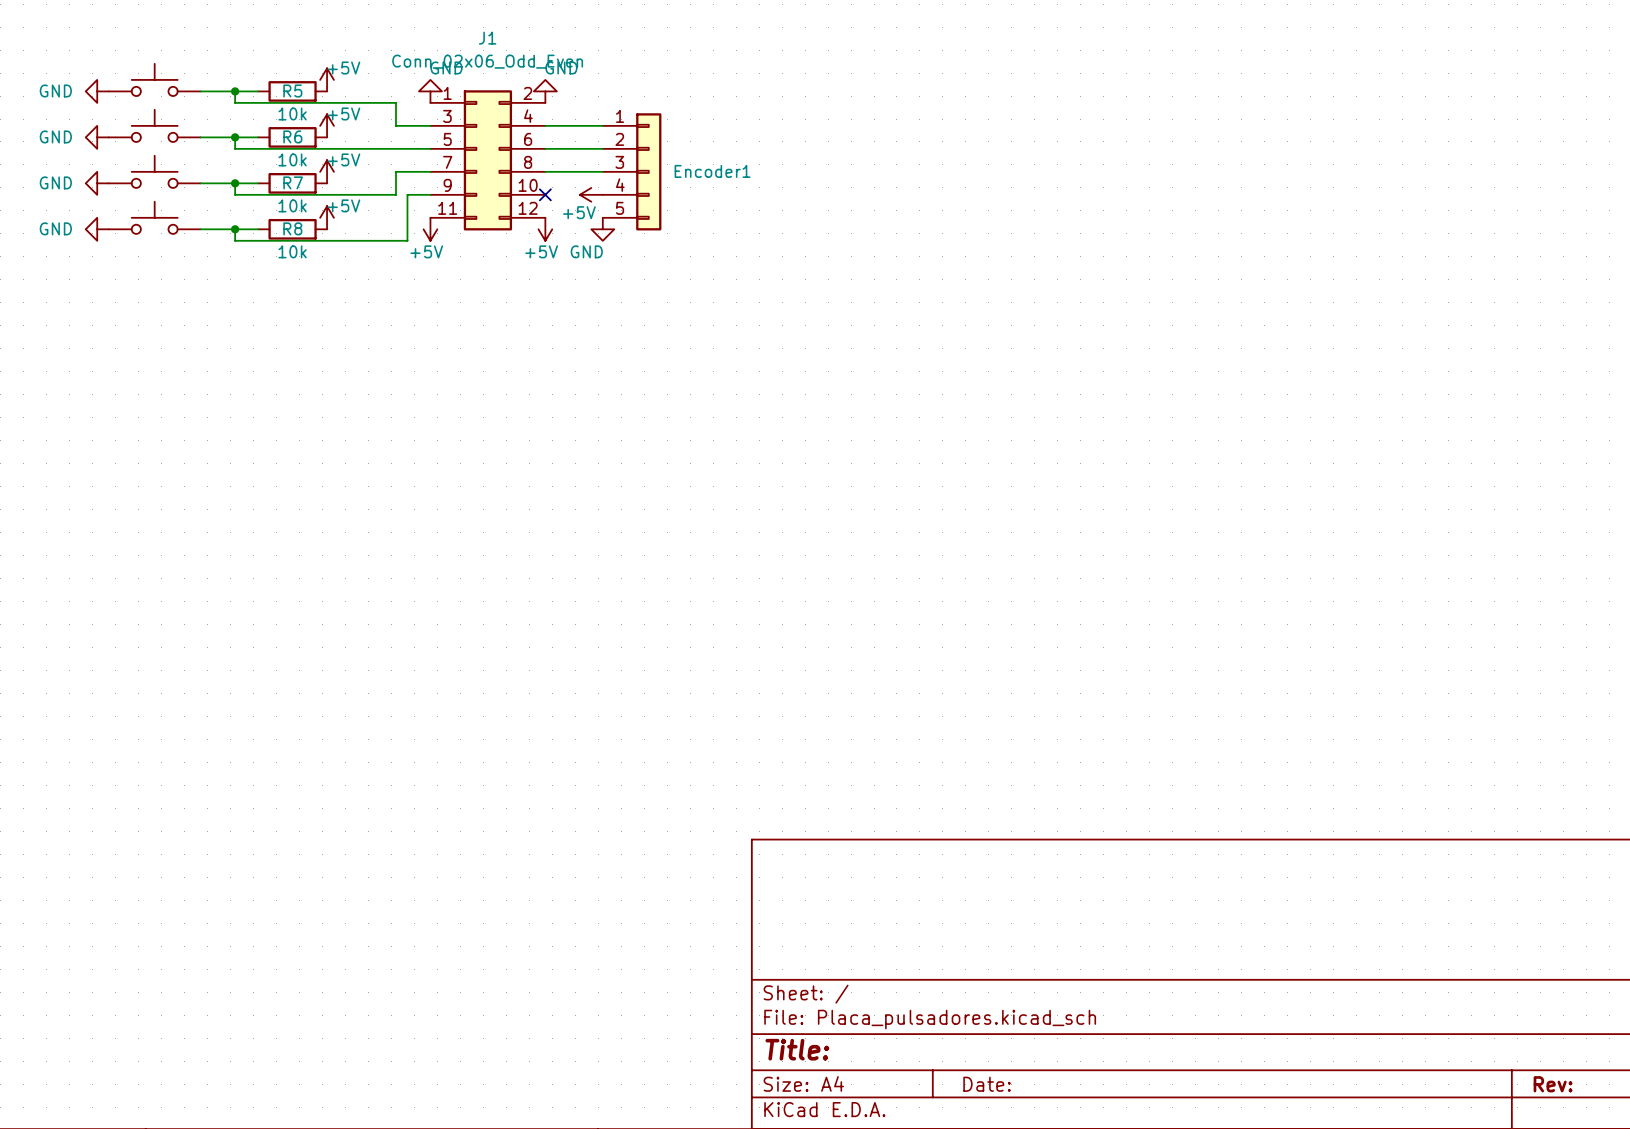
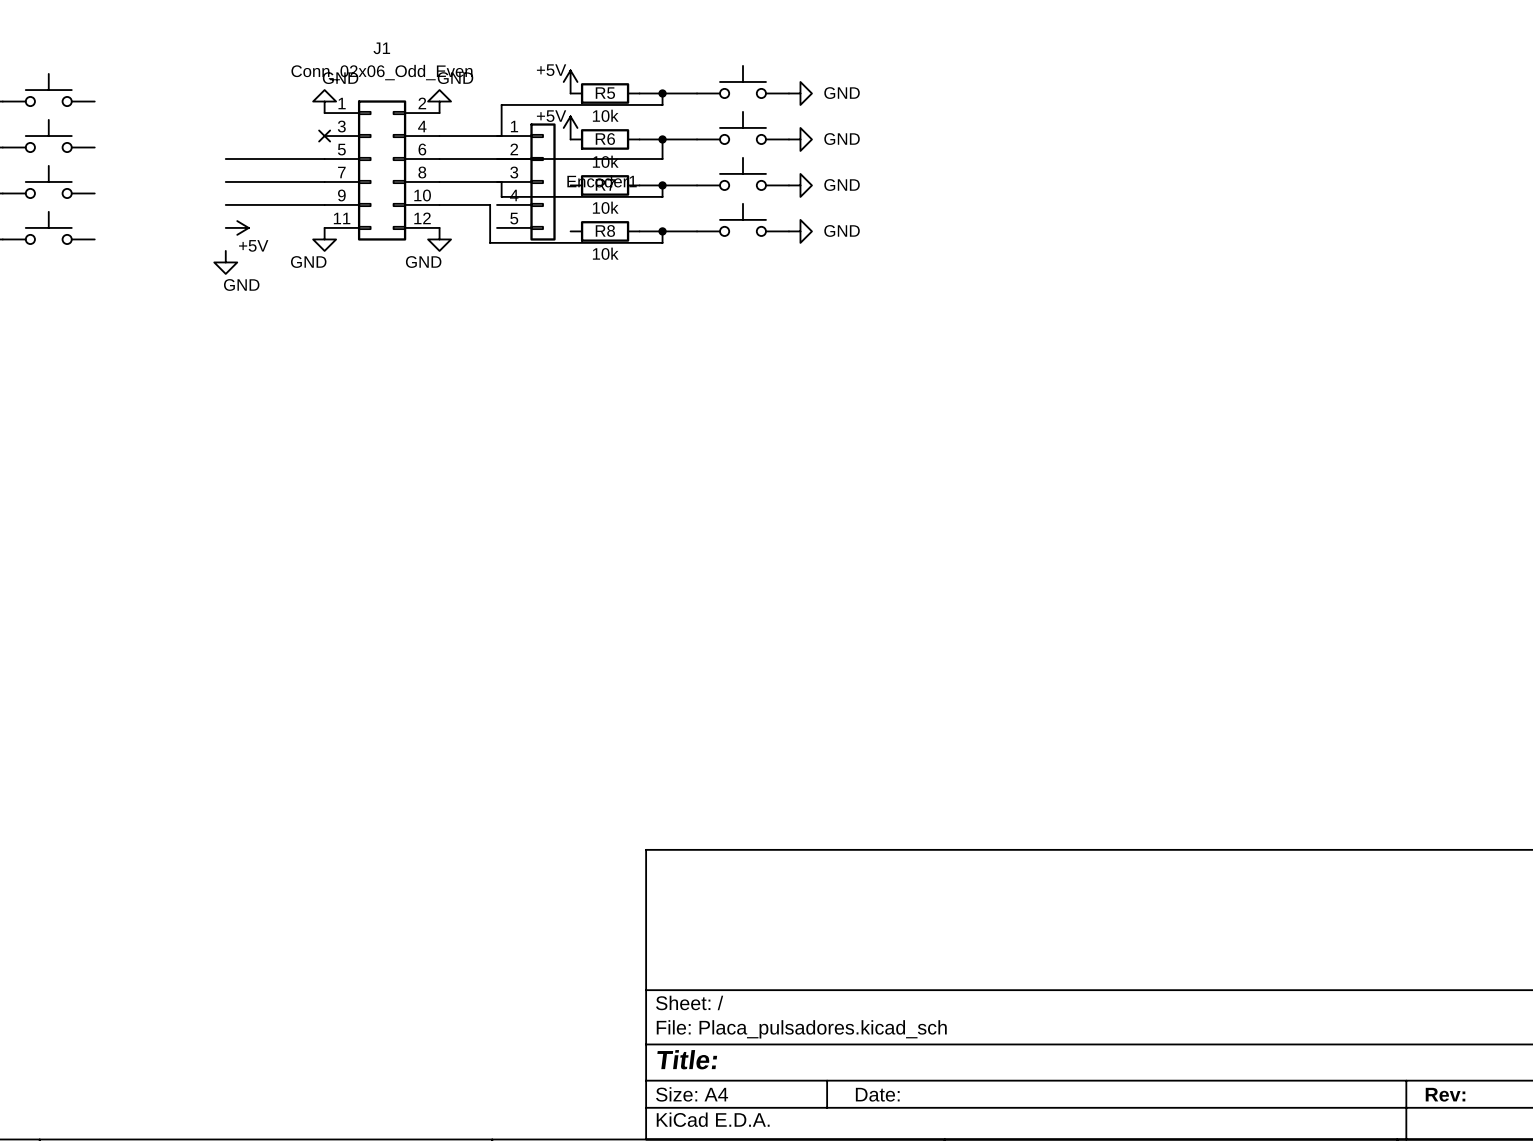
power symbol: none -> +5V (570, 81)
part: none -> (743, 81)
power symbol: +5V (327, 79) -> none
wire: none -> (639, 93) (697, 93)
wire: none -> (662, 93) (662, 104) (501, 104) (501, 136) (497, 136)
junction: none -> (662, 93)
power symbol: none -> GND (800, 93)
wire: (200, 91) (258, 91) -> none
wire: (235, 91) (235, 102) (395, 102) (395, 125) (430, 125) -> none
junction: (235, 91) -> none
R5 position: (292, 91) -> (605, 93)
power symbol: none -> +5V (570, 127)
part: none -> (743, 127)
power symbol: +5V (327, 125) -> none
no-connect mark: none -> (324, 136)
wire: none -> (639, 139) (697, 139)
wire: none -> (662, 139) (662, 159) (497, 159)
junction: none -> (662, 139)
power symbol: none -> GND (800, 139)
wire: (200, 137) (258, 137) -> none
wire: (235, 137) (235, 148) (331, 148) -> none
junction: (235, 137) -> none
R6 position: (292, 137) -> (605, 139)
part: none -> (743, 173)
power symbol: +5V (327, 171) -> none
wire: none -> (225, 181) (290, 181)
wire: (395, 171) (395, 194) -> (301, 204) (290, 204)
wire: none -> (497, 181) (501, 181) (501, 196) (662, 196) (662, 185)
wire: none -> (639, 185) (697, 185)
junction: none -> (662, 185)
power symbol: none -> GND (800, 185)
wire: (200, 183) (258, 183) -> none
wire: (235, 183) (235, 194) (331, 194) -> none
junction: (235, 183) -> none
R7 position: (292, 183) -> (605, 185)
wire: (407, 194) (407, 240) (235, 240) (235, 229) -> none
wire: none -> (439, 204) (490, 204) (490, 242) (662, 242) (662, 231)
no-connect mark: (545, 194) -> none
power symbol: +5V (591, 194) -> none
part: none -> (743, 219)
power symbol rotation: 0° (327, 217) -> 90° clockwise (237, 227)
power symbol position: +5V (327, 217) -> +5V (237, 227)
wire: none -> (639, 231) (697, 231)
junction: none -> (662, 231)
power symbol: none -> GND (800, 231)
wire: (200, 229) (258, 229) -> none
junction: (235, 229) -> none
R8 position: (292, 229) -> (605, 231)
power symbol: +5V (430, 229) -> GND (324, 239)
power symbol: +5V (545, 229) -> GND (439, 239)
power symbol: GND (602, 229) -> none
power symbol: none -> GND (225, 262)

